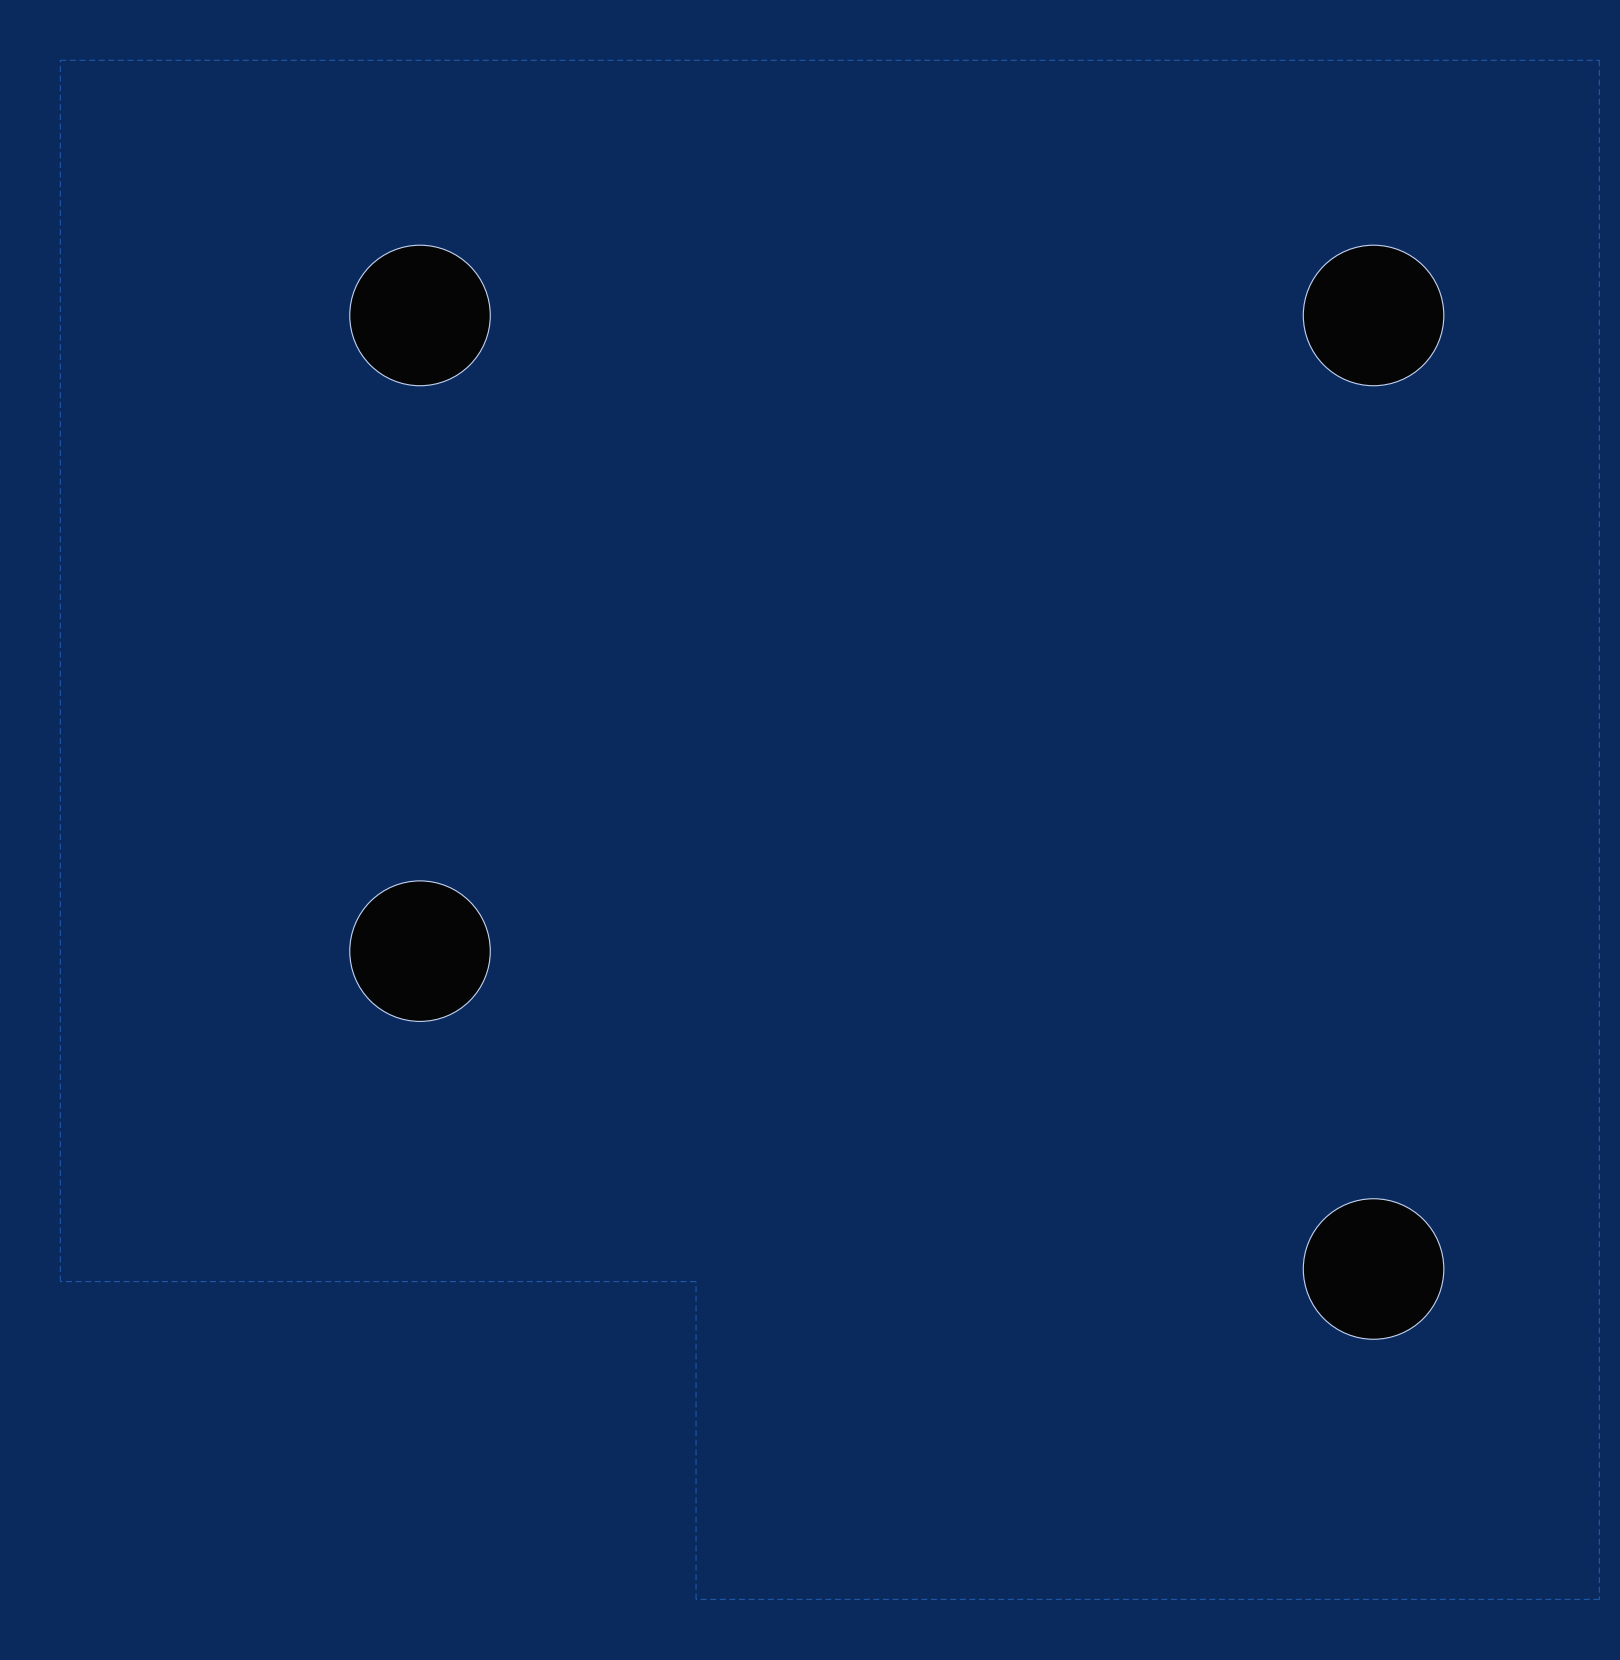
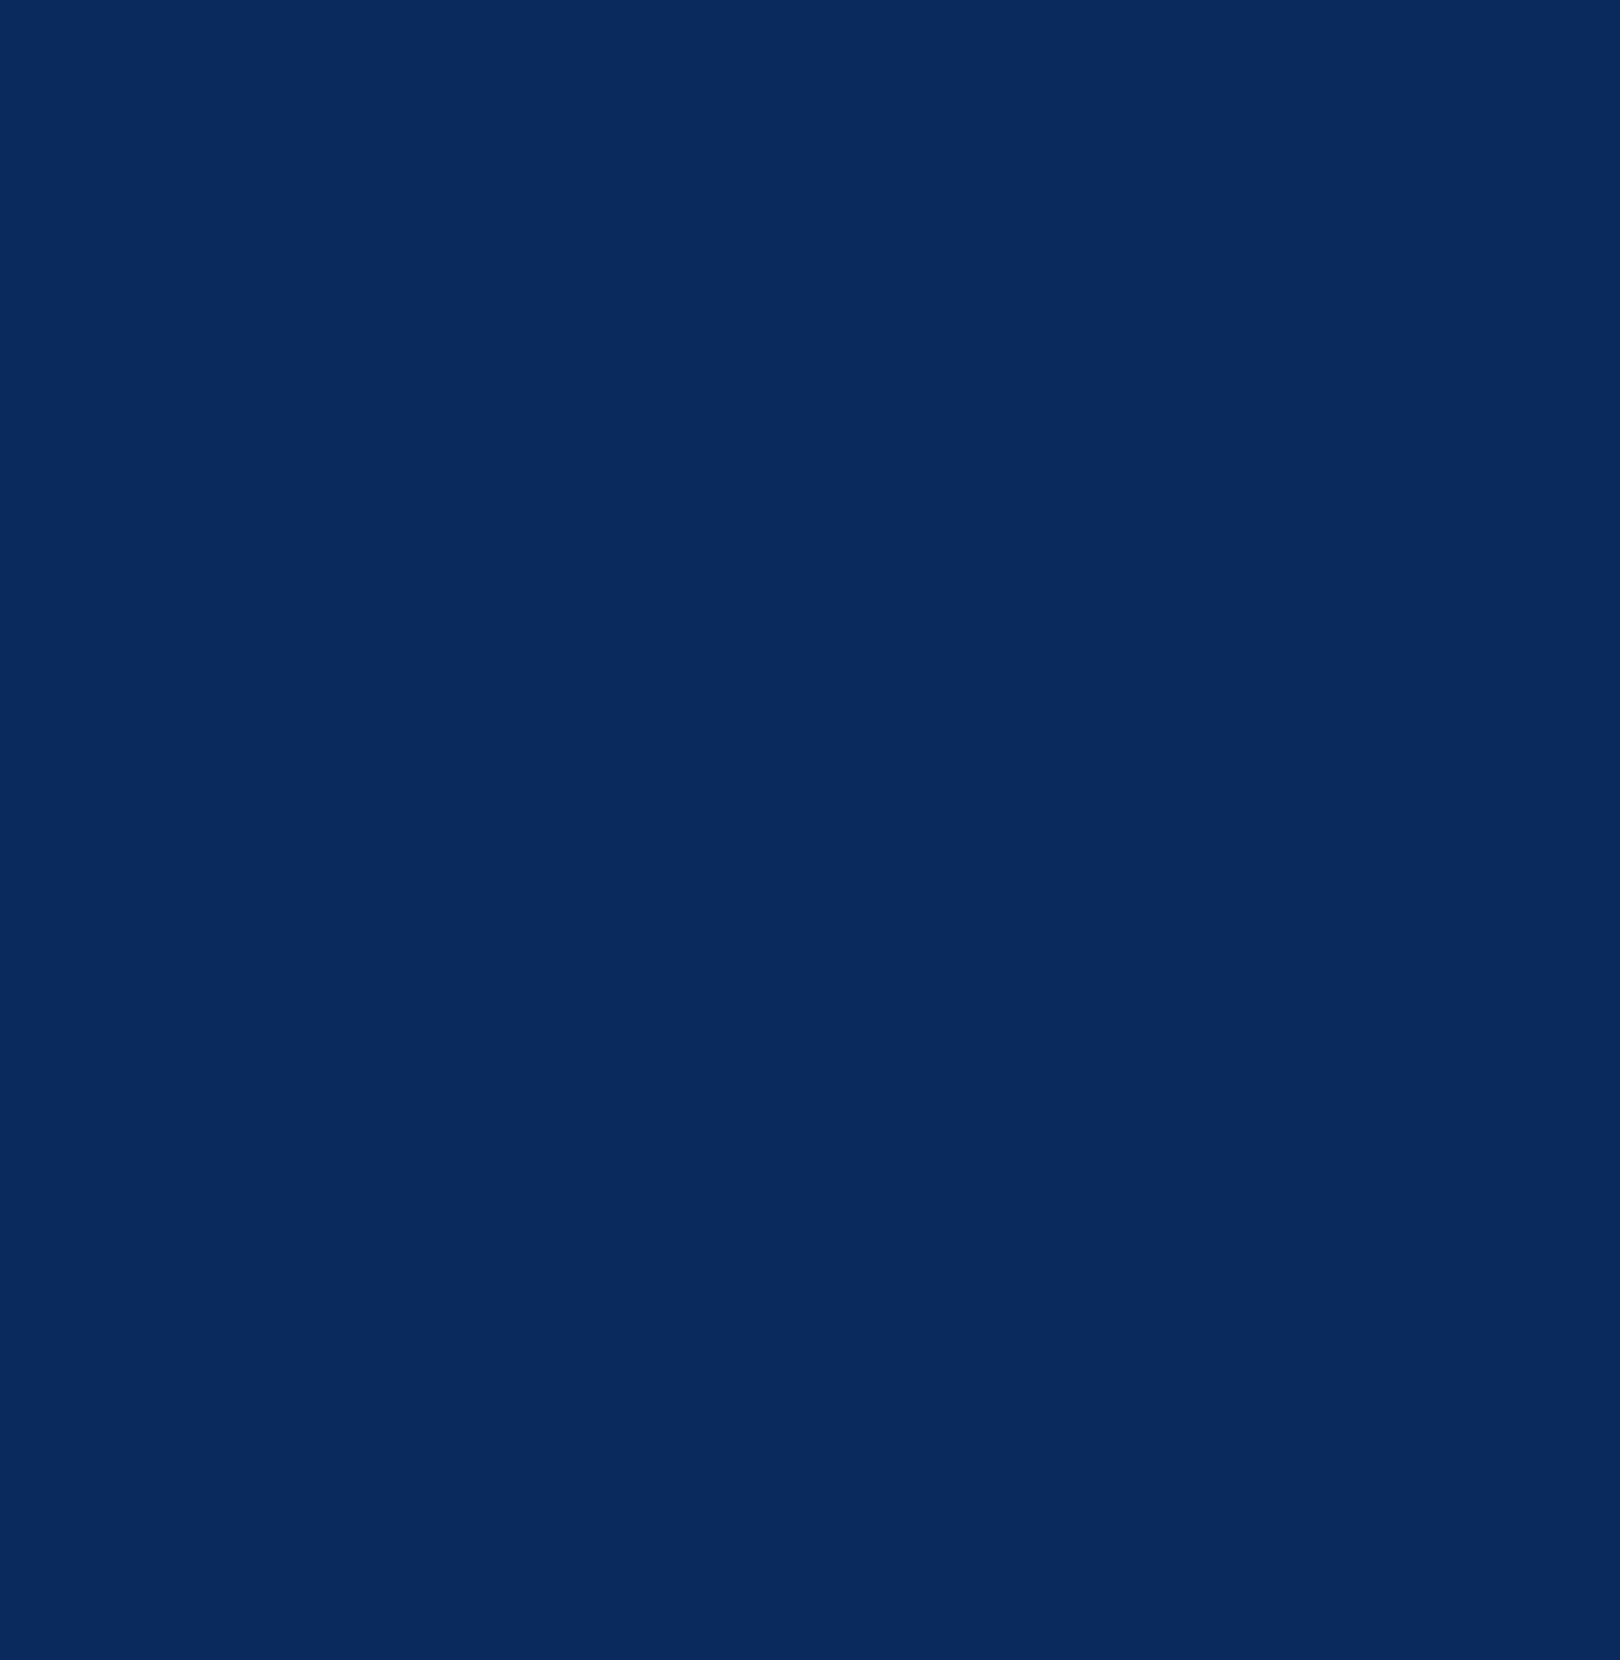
zone outline: (60, 60) (60, 1281) (696, 1281) (696, 1599) (1599, 1599) (1599, 60) (60, 60) -> none
part: (420, 315) -> none
part: (1373, 315) -> none
part: (420, 951) -> none
part: (1373, 1269) -> none

